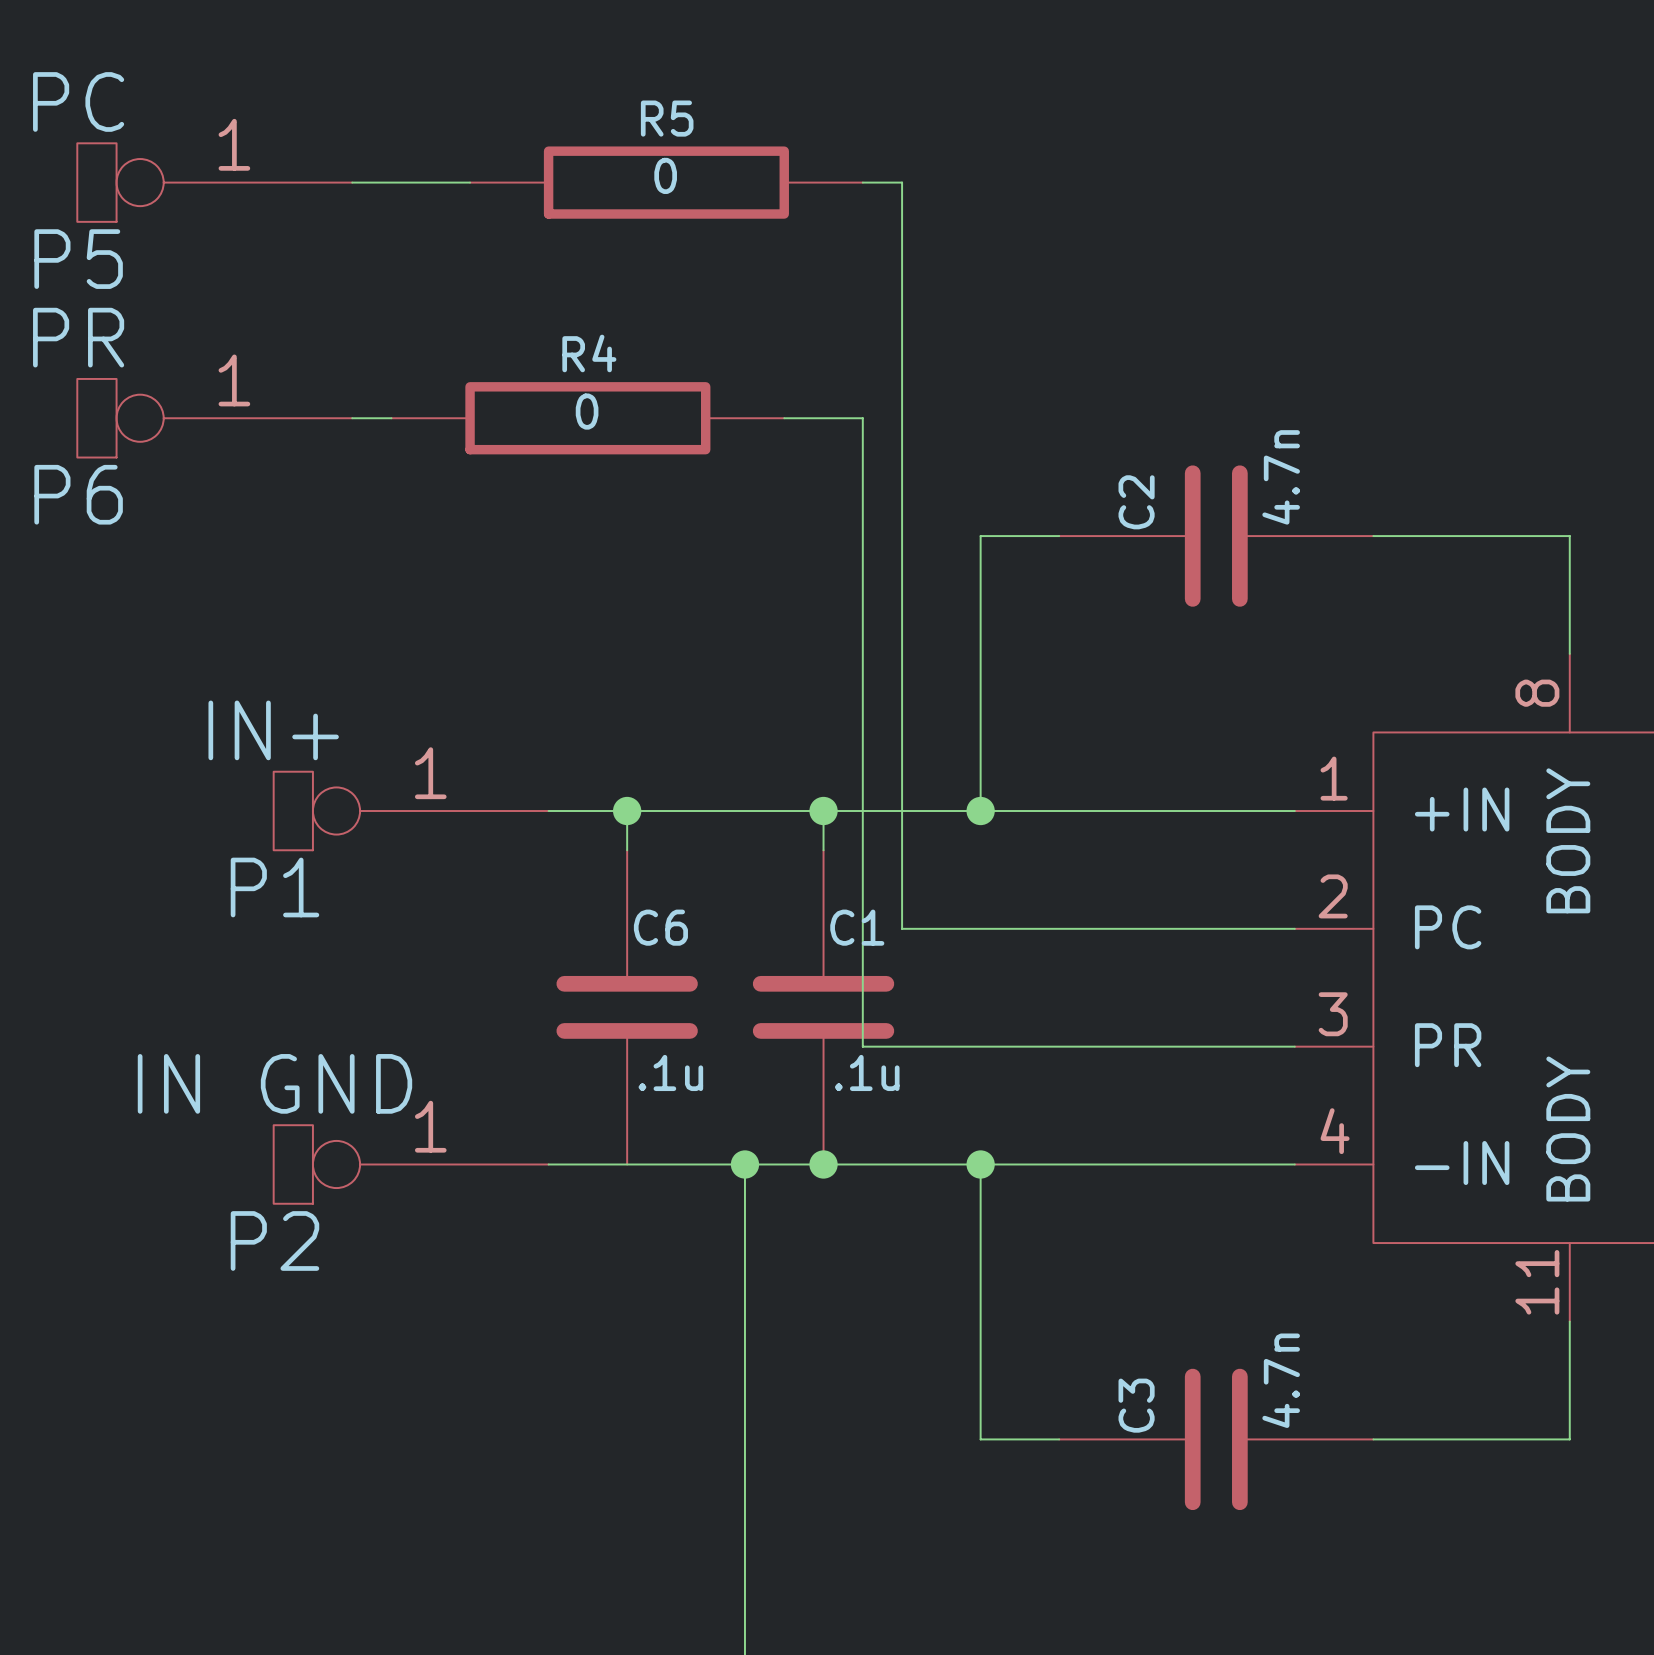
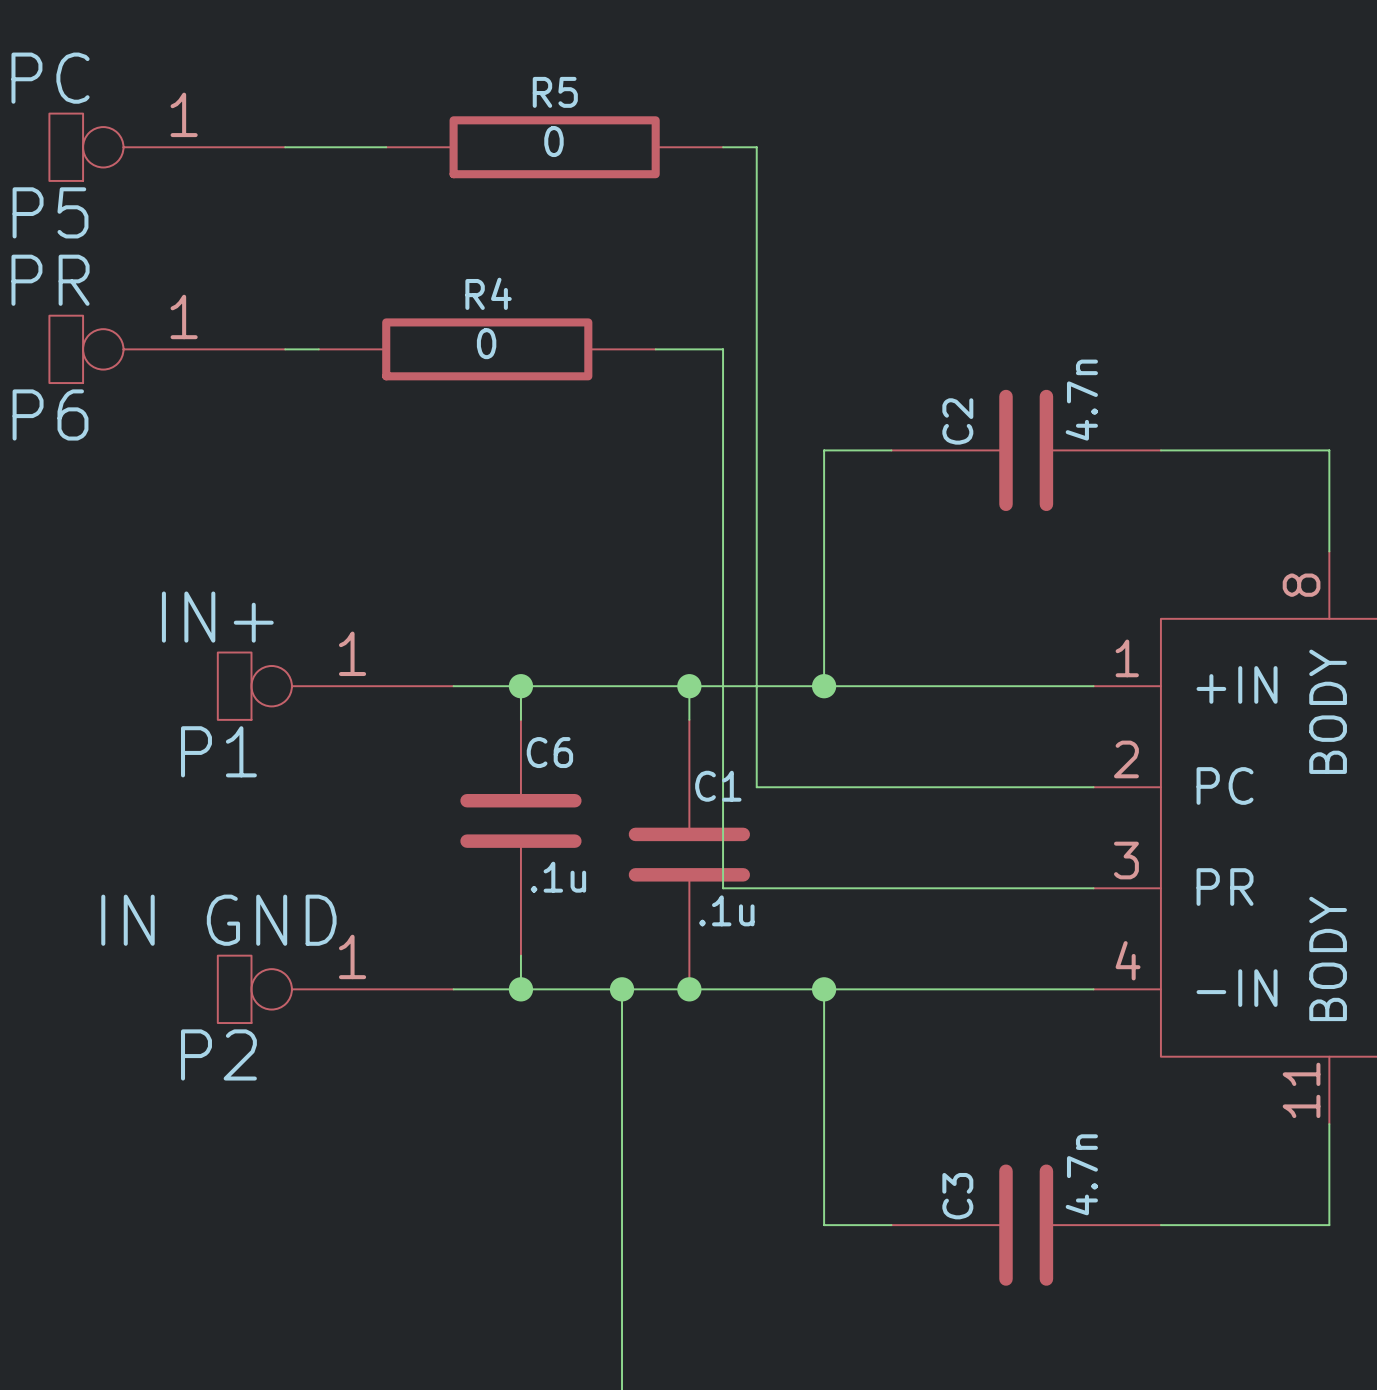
C6 position: (627, 1007) -> (520, 820)
junction: none -> (520, 989)

